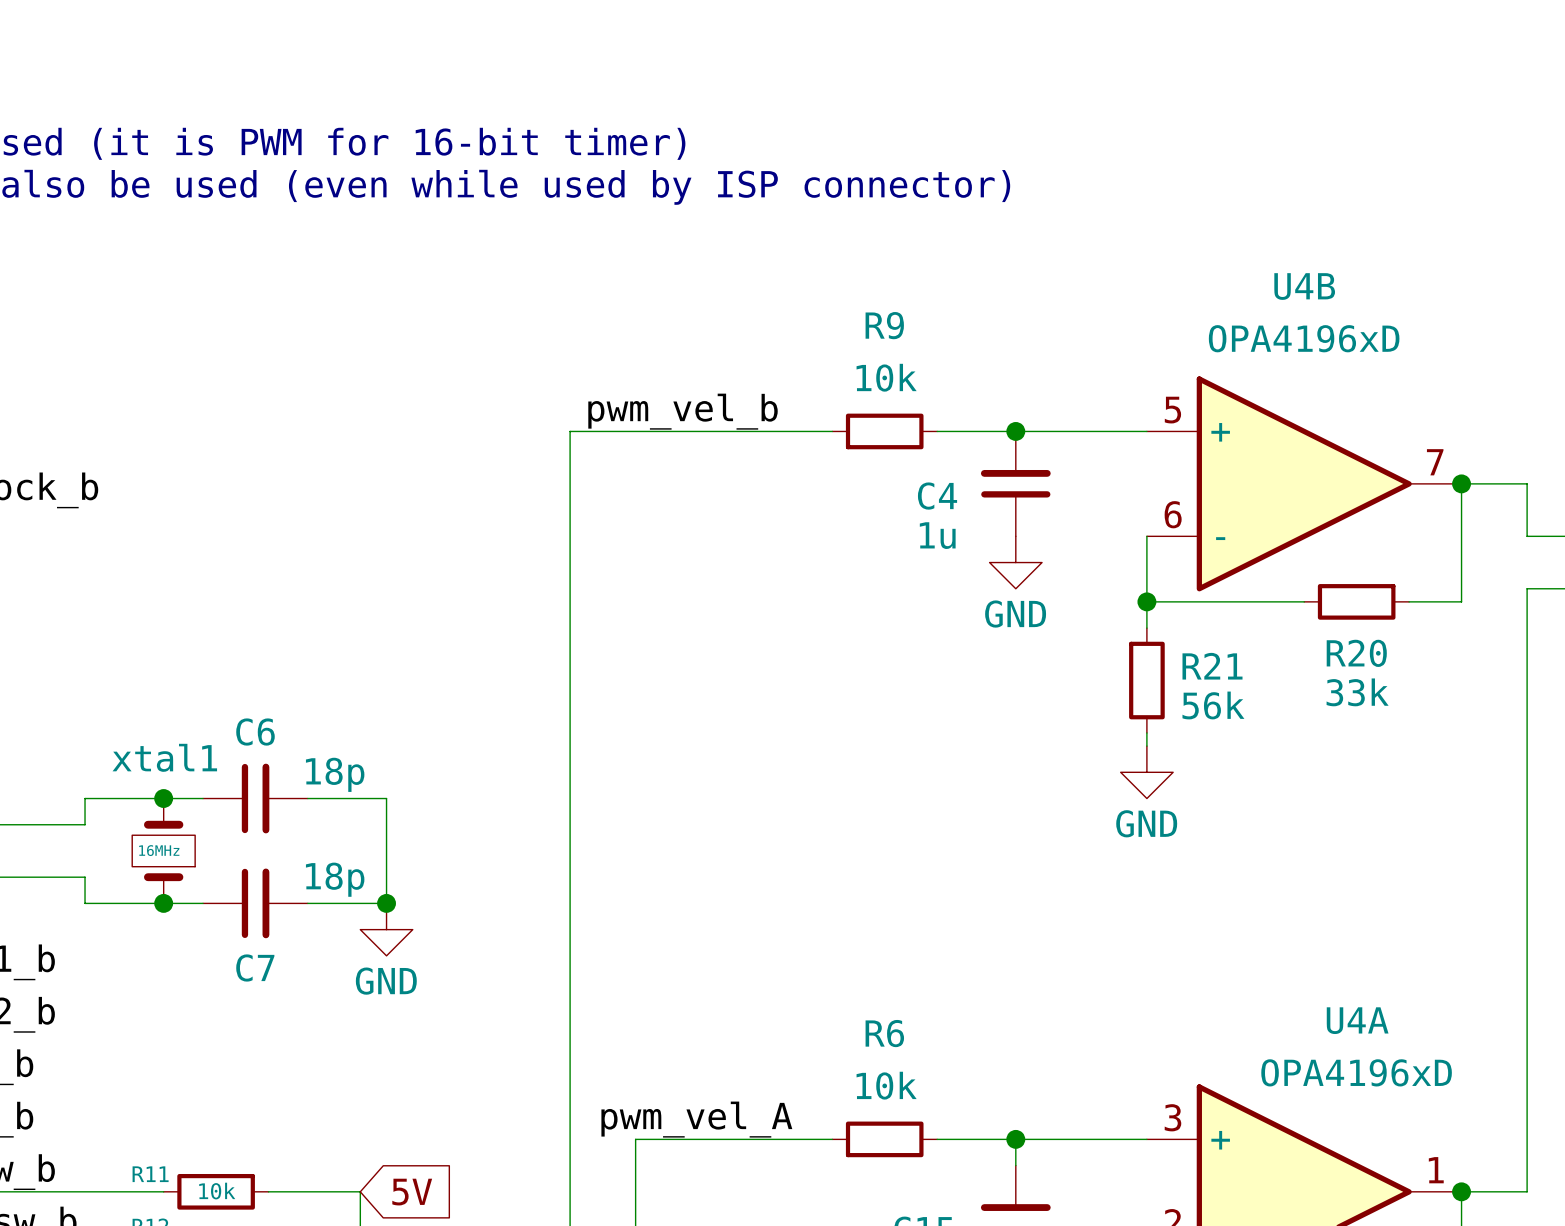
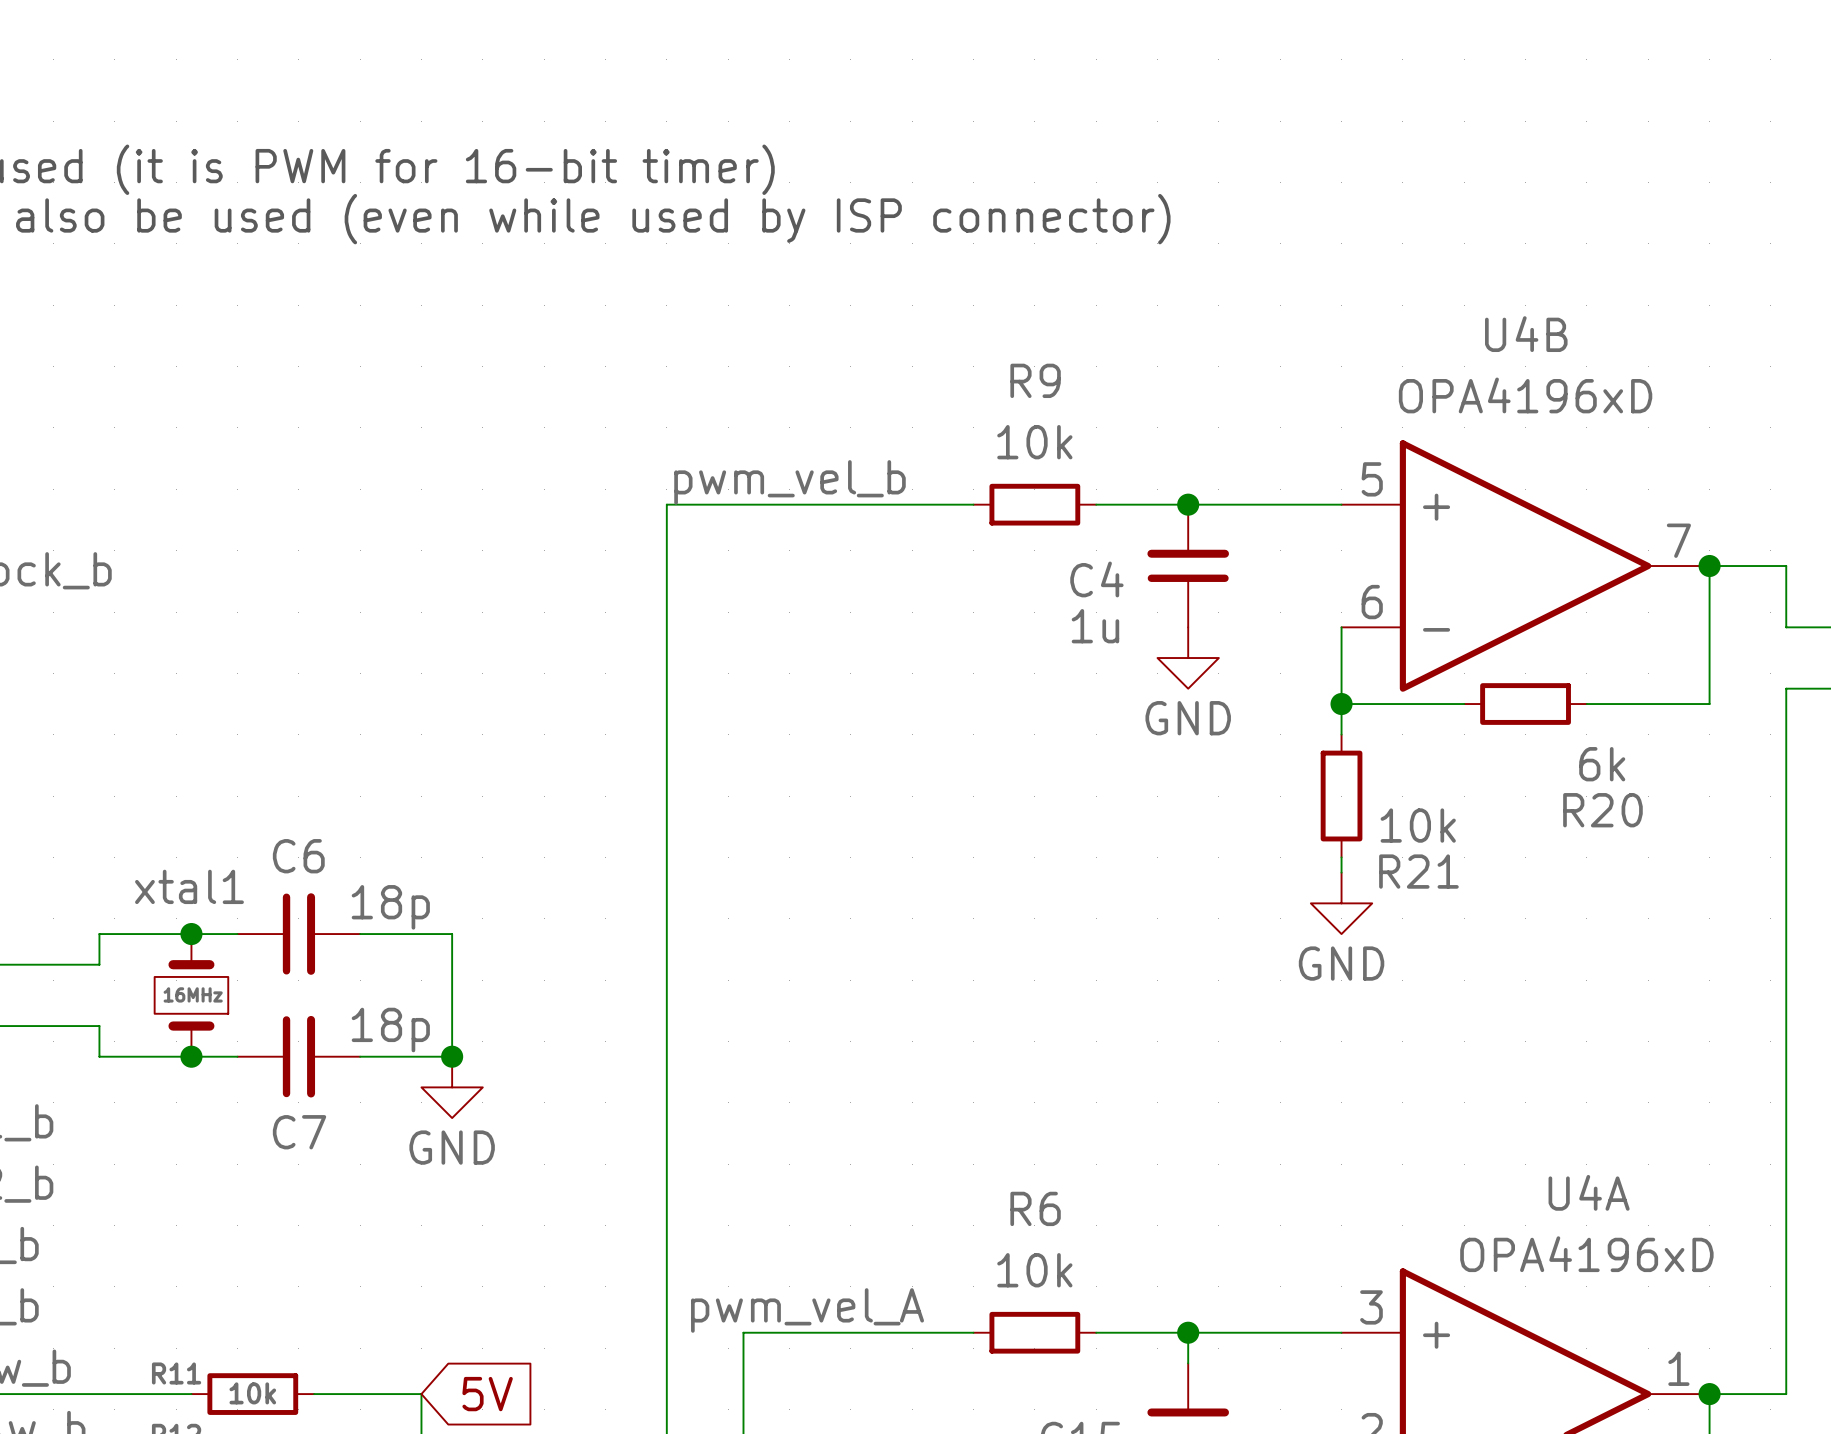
wire: (1251, 601) (1304, 601) -> (1586, 704) (1648, 704)
R20 position: (1356, 601) -> (1525, 704)
R20 name position: R20 (1356, 653) -> R20 (1602, 810)
R21 name position: R21 (1212, 666) -> R21 (1418, 871)
R20 value: 33k (1357, 692) -> 6k (1602, 764)
R21 value: 56k (1213, 705) -> 10k (1418, 825)

